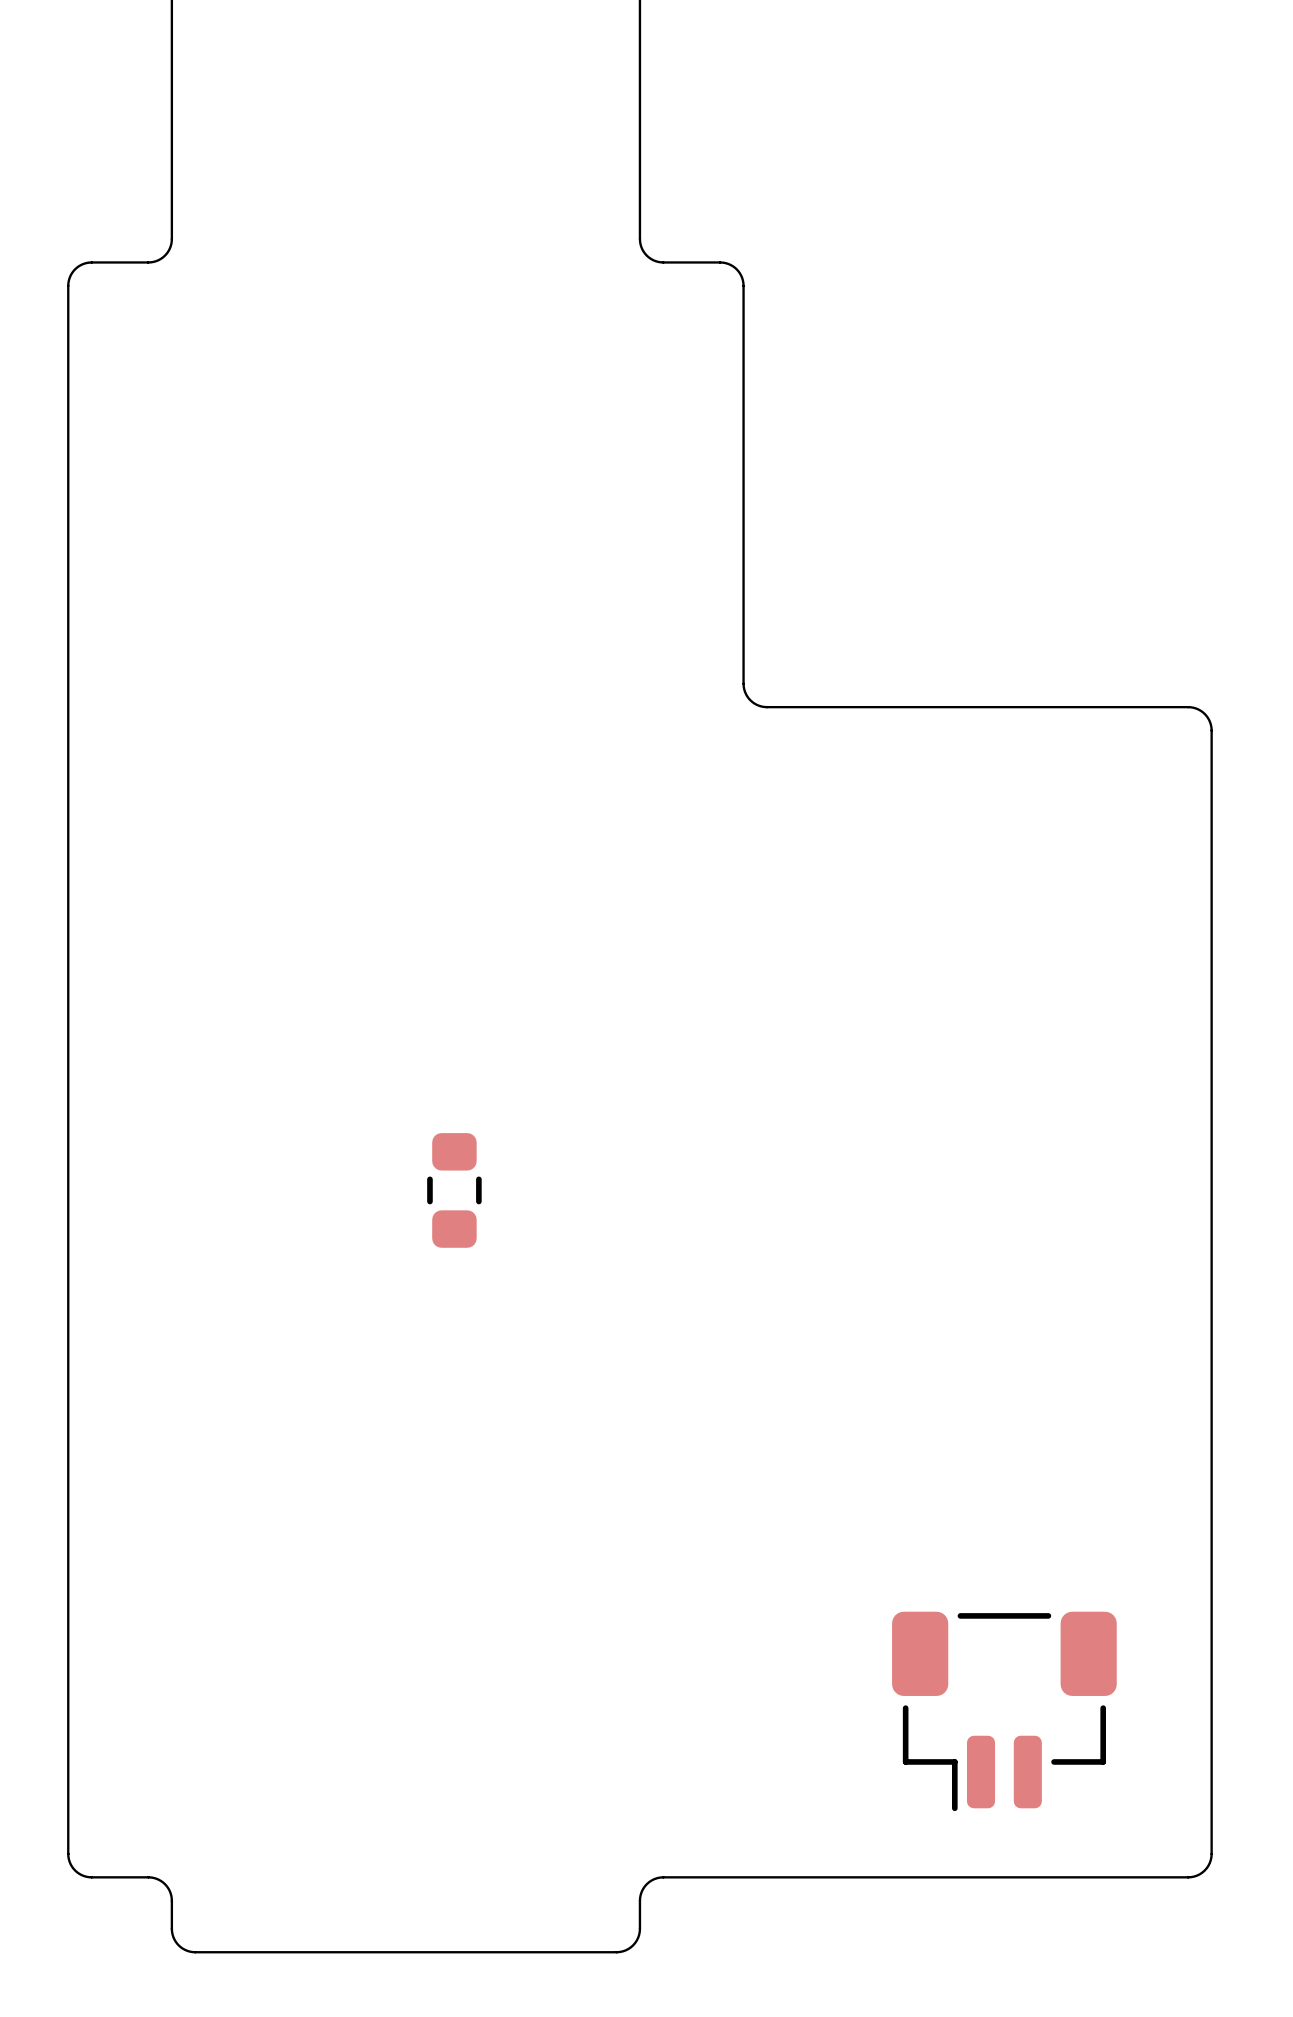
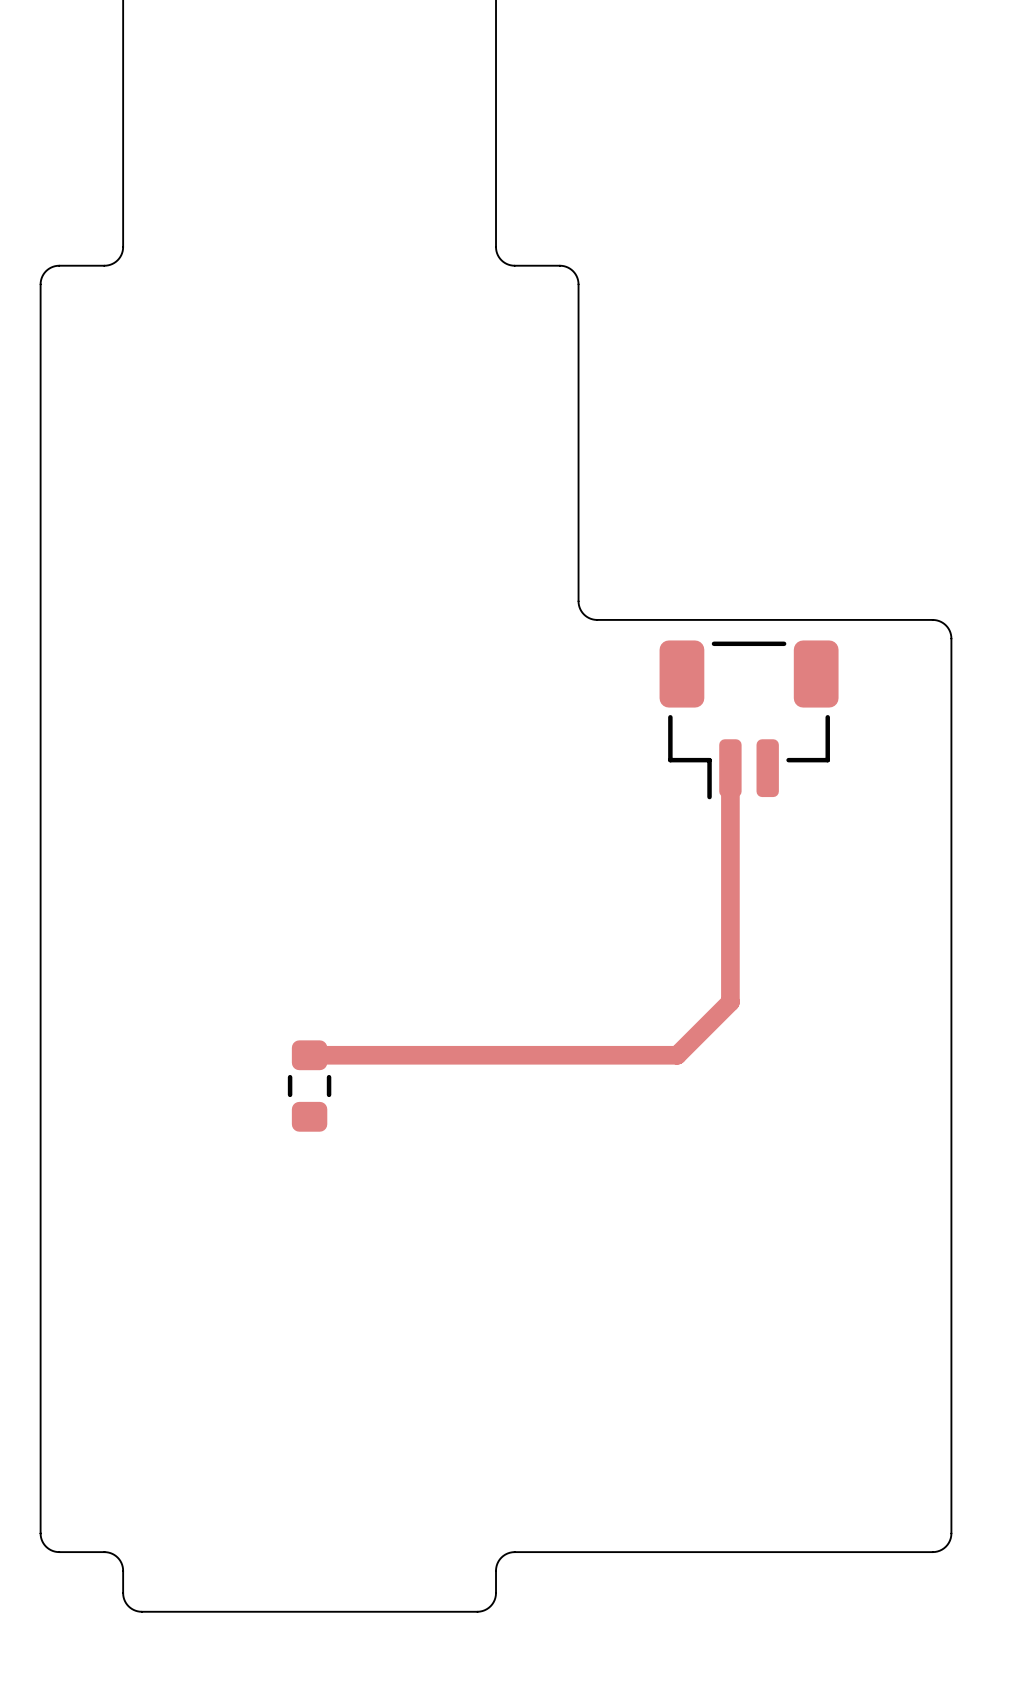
track: none -> (730, 768) (730, 1002) (677, 1055) (309, 1055)
part position: (454, 1190) -> (309, 1086)
part position: (1004, 1711) -> (749, 719)

